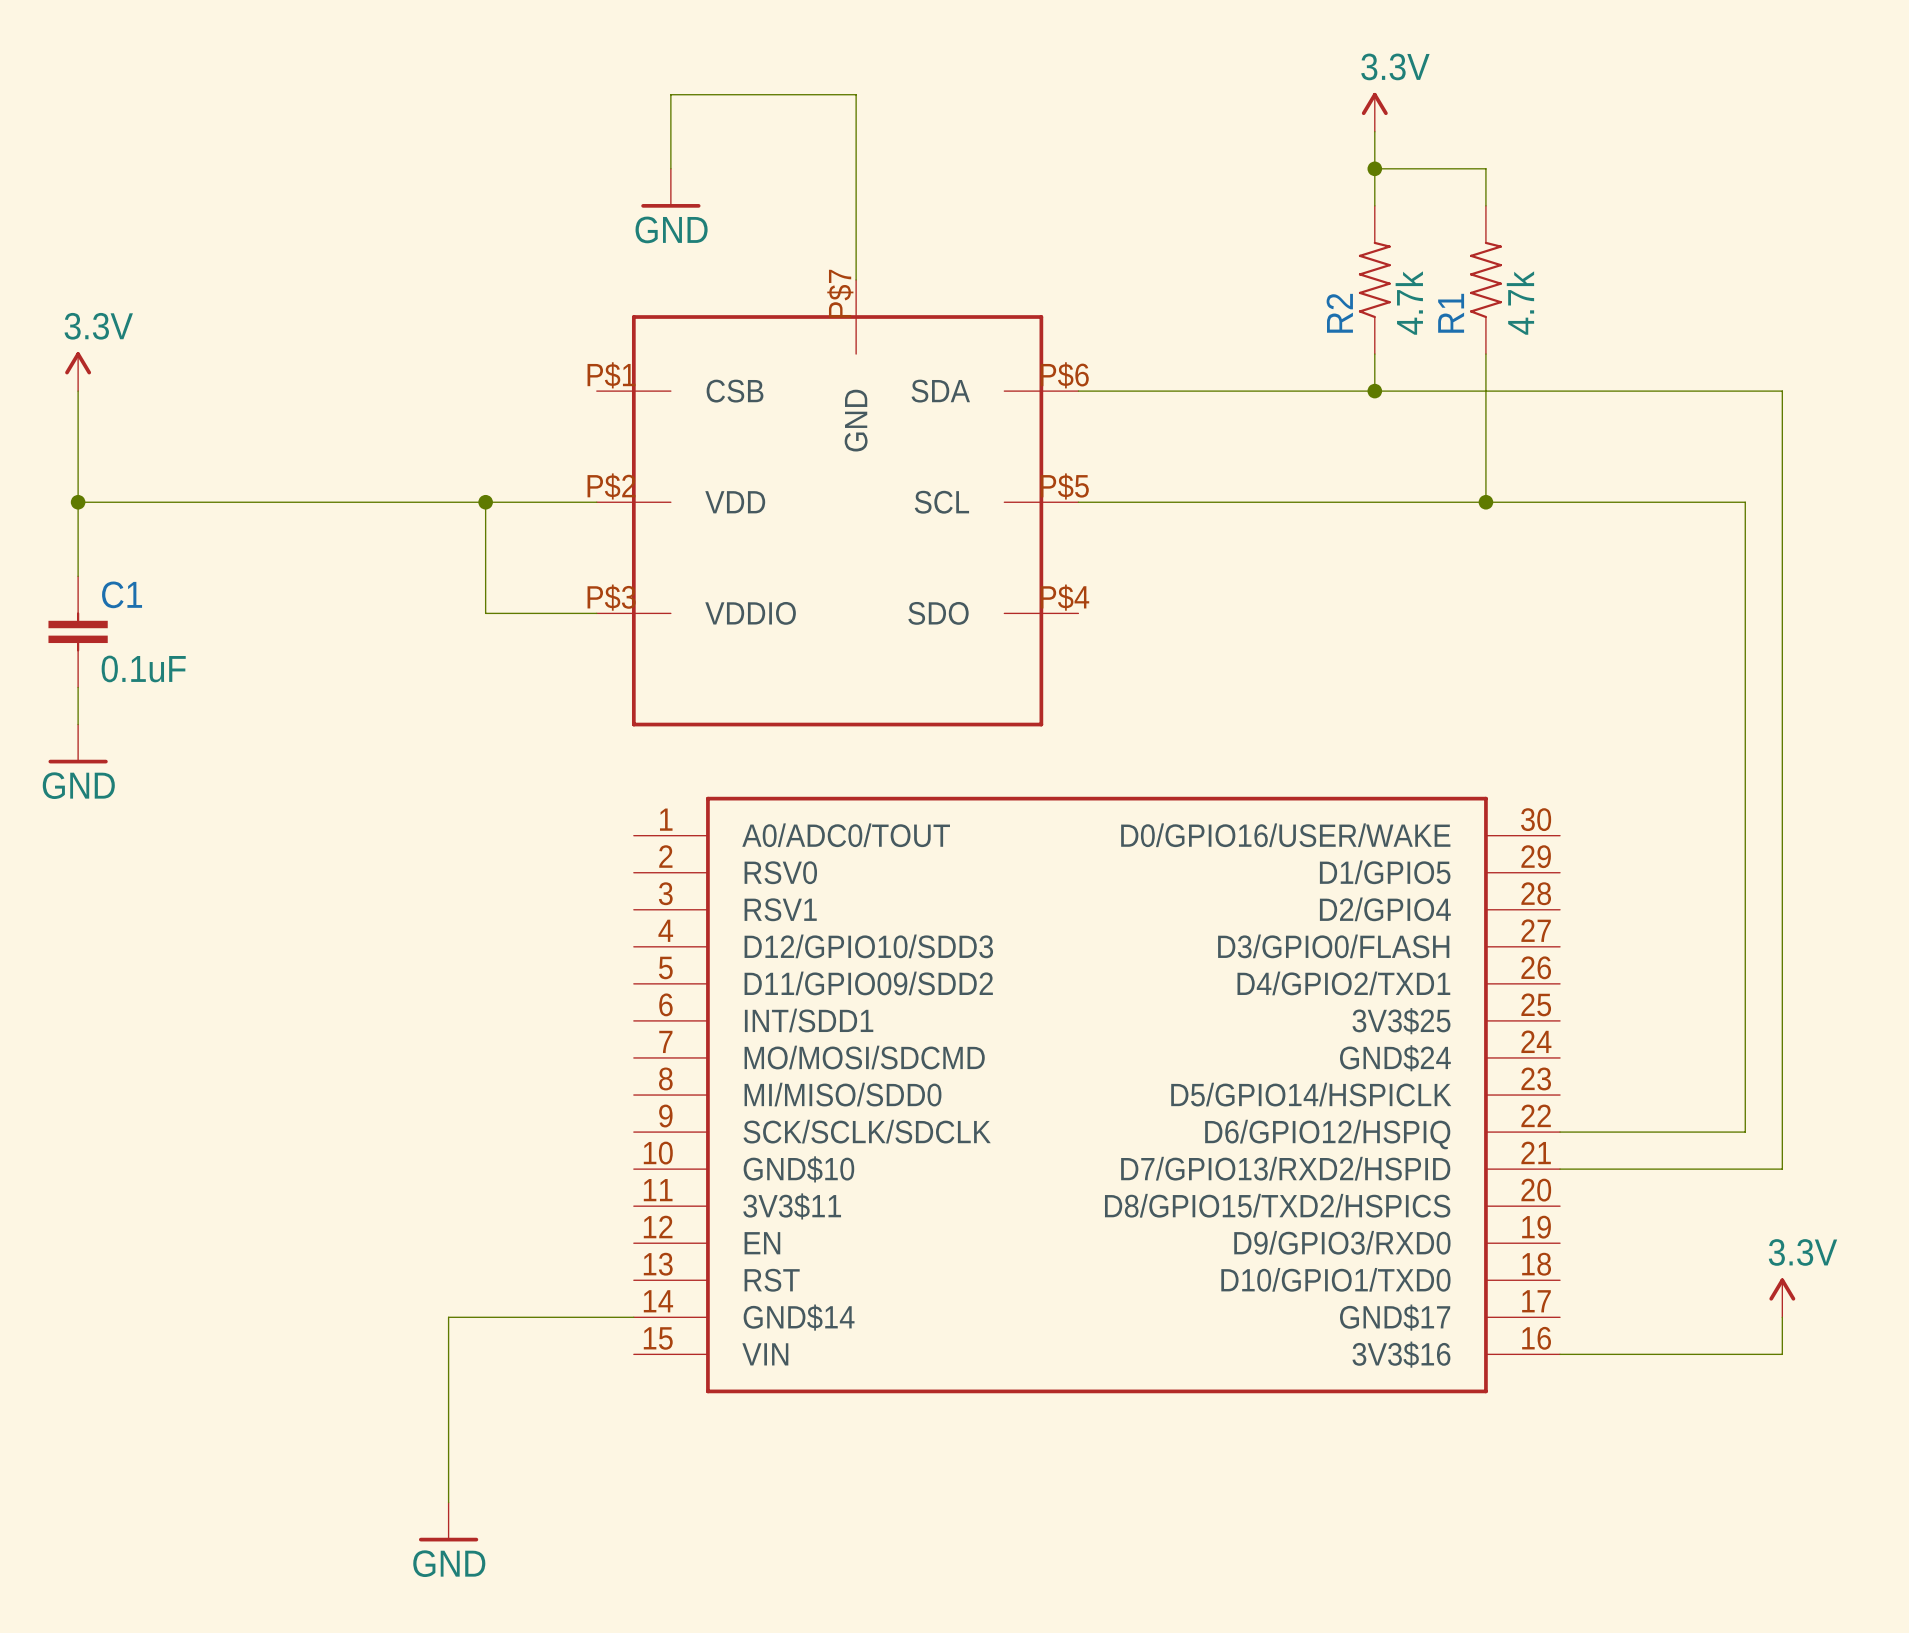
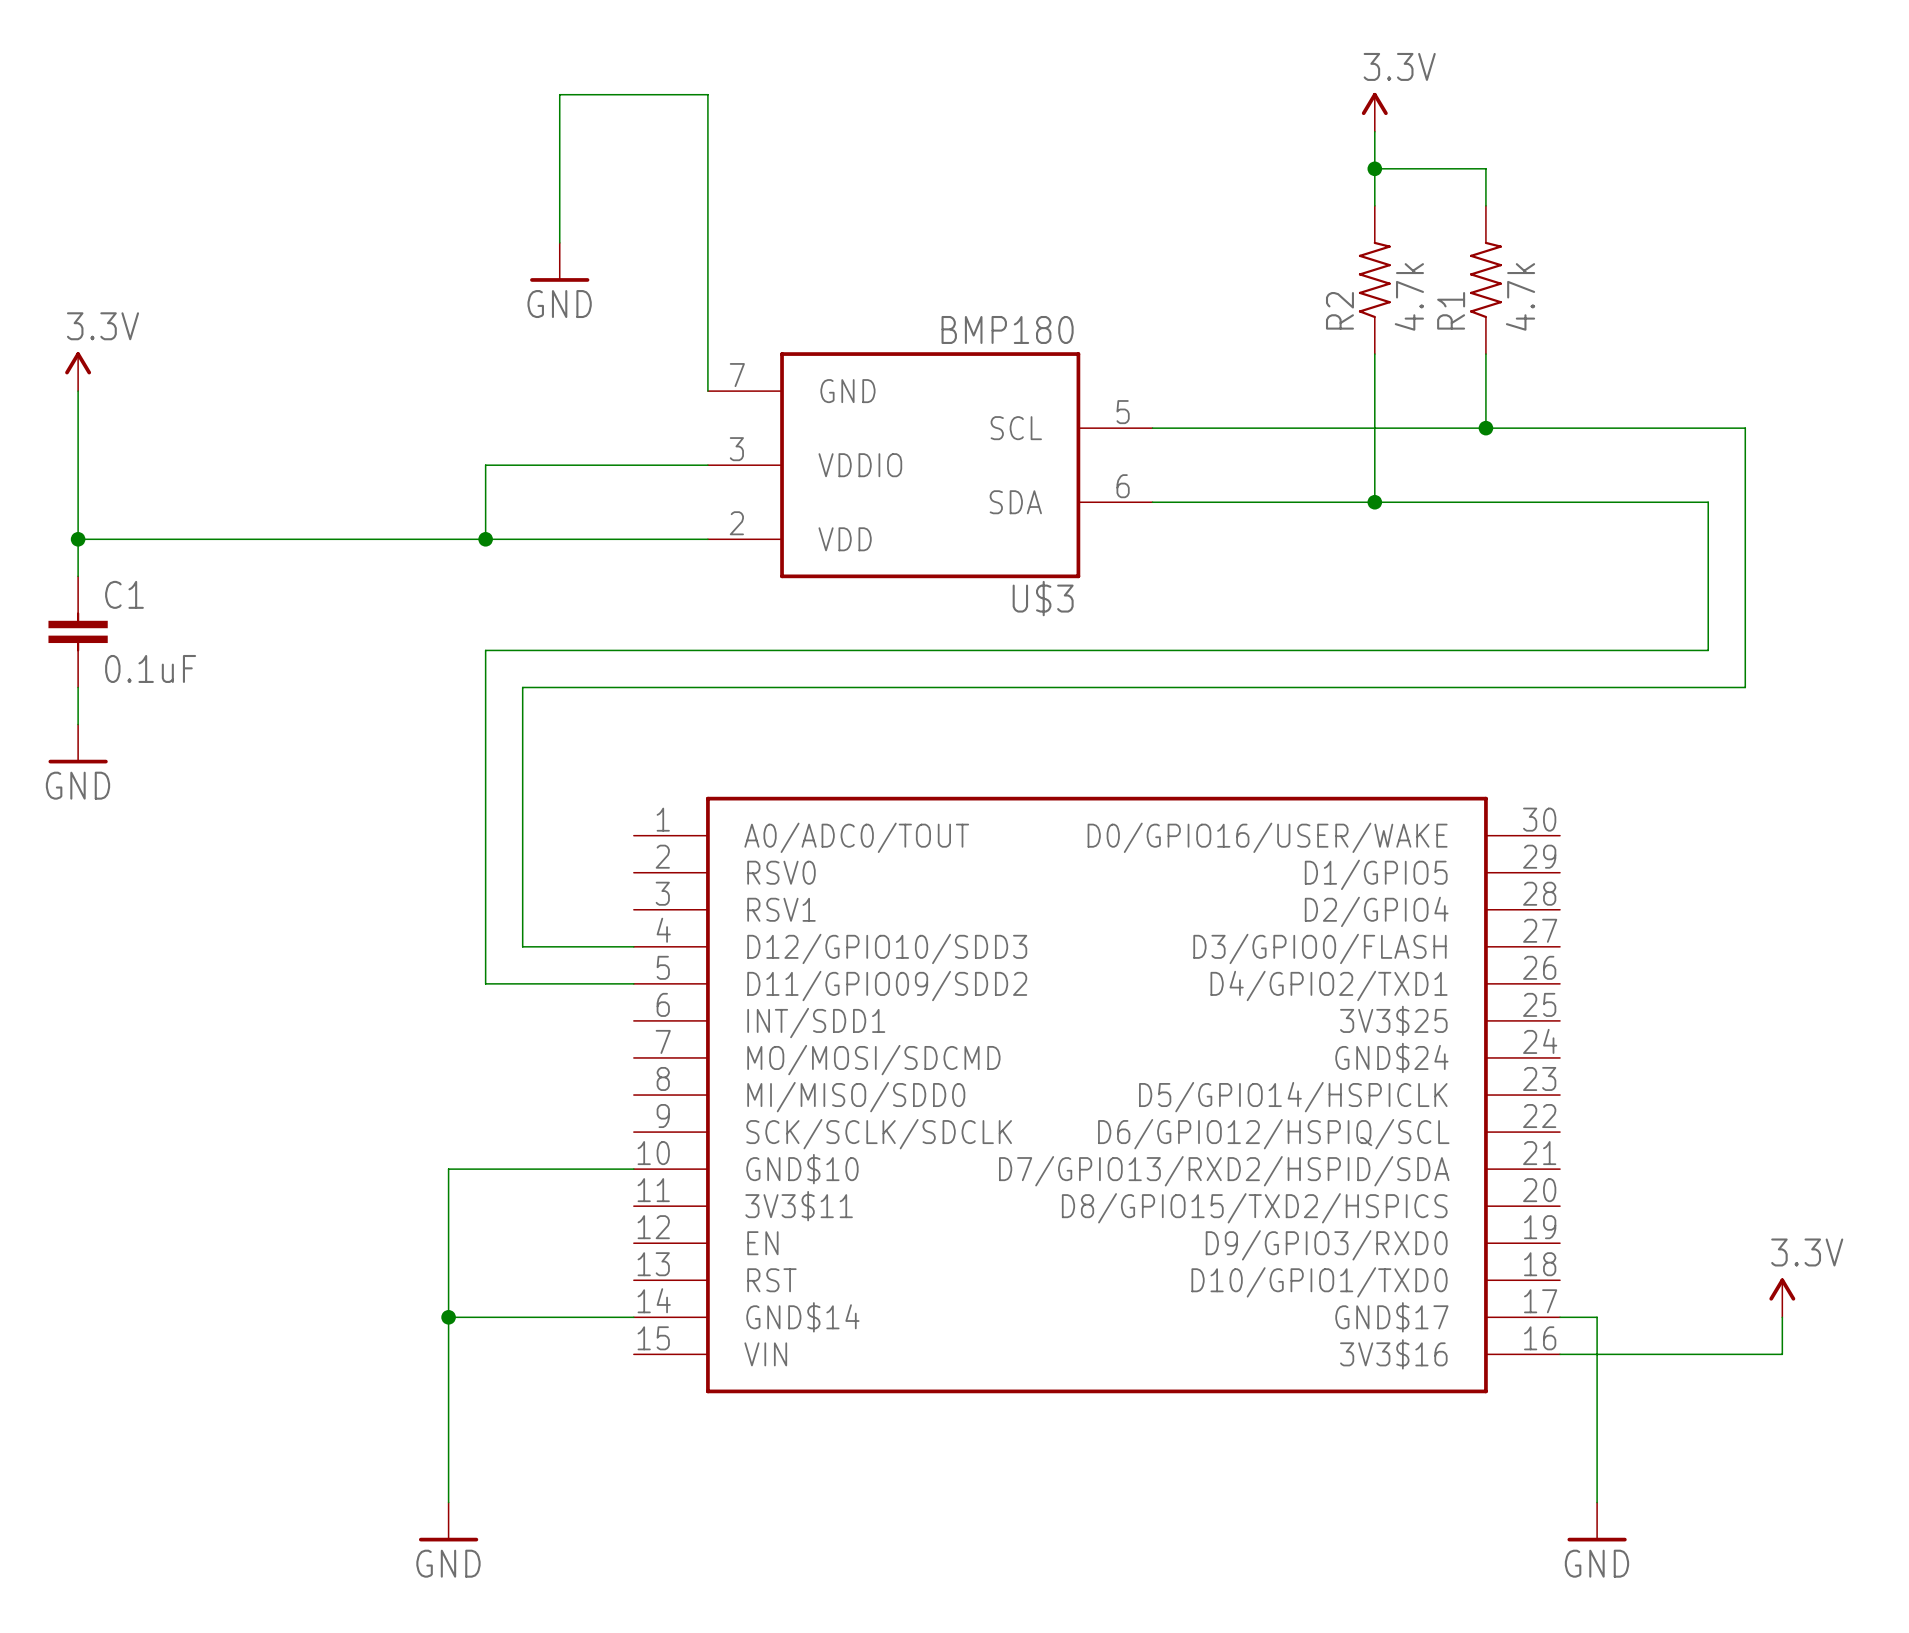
wire: (670, 94) (670, 168) -> (670, 94) (559, 94) (559, 242)
wire: (707, 94) (856, 94) (856, 279) -> (707, 94) (707, 391)
power symbol position: GND (670, 188) -> GND (559, 262)
wire: (1078, 391) (1782, 391) (1782, 1169) (1560, 1169) -> none
wire: none -> (1374, 391) (1374, 502)
junction: (1374, 391) -> none
wire: (1485, 428) (1485, 502) -> none
junction: none -> (1485, 428)
wire: none -> (707, 465) (485, 465) (485, 502)
U$3: none -> BMP180 (930, 465)
wire: (78, 502) (596, 502) -> none
junction position: (78, 502) -> (78, 539)
junction position: (485, 502) -> (485, 539)
junction: none -> (1374, 502)
junction: (1485, 502) -> none
wire: (1708, 502) (1745, 502) -> (1152, 428) (1745, 428) (1745, 502)
wire: none -> (1708, 502) (1708, 650) (485, 650) (485, 983) (633, 983)
part: (837, 503) -> none
wire: none -> (78, 539) (707, 539)
wire: (485, 539) (485, 613) (596, 613) -> none
wire: (1745, 687) (1745, 1132) (1560, 1132) -> (1745, 687) (522, 687) (522, 946) (633, 946)
part pin name: D6/GPIO12/HSPIQ (1327, 1134) -> D6/GPIO12/HSPIQ/SCL (1273, 1134)
part pin name: D7/GPIO13/RXD2/HSPID (1285, 1168) -> D7/GPIO13/RXD2/HSPID/SDA (1224, 1171)
wire: none -> (633, 1169) (448, 1169) (448, 1317)
junction: none -> (448, 1317)
wire: none -> (1560, 1317) (1597, 1317) (1597, 1502)
power symbol: none -> GND (1597, 1522)

